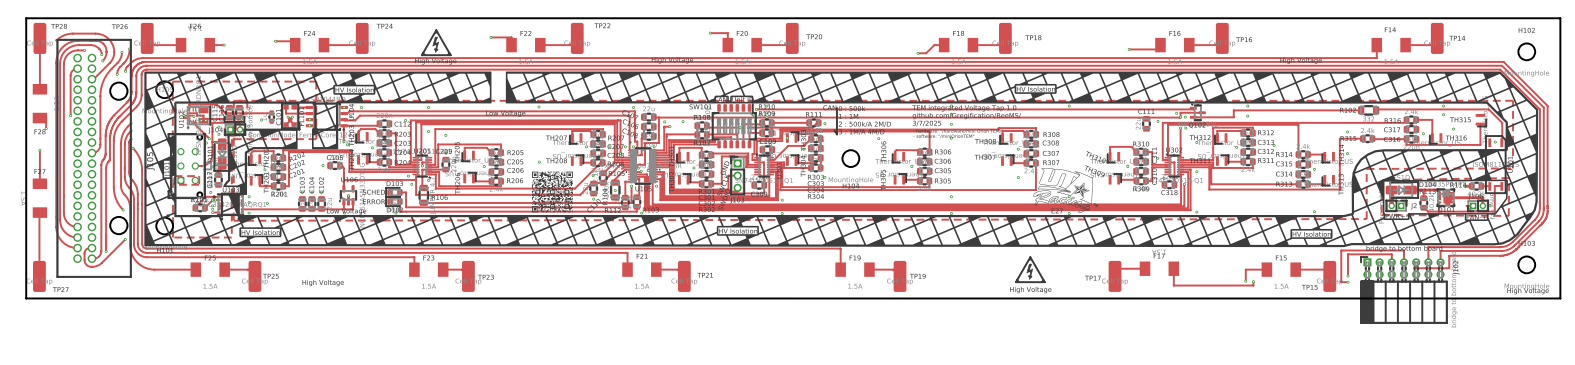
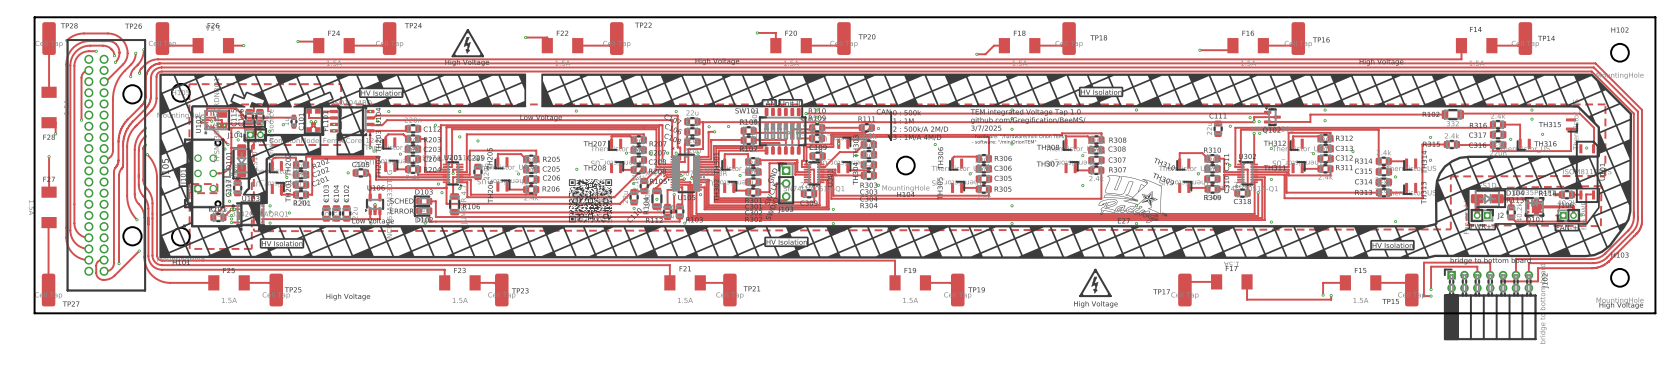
drawing shape: [144, 71, 1539, 248] -> [159, 73, 1633, 260]

